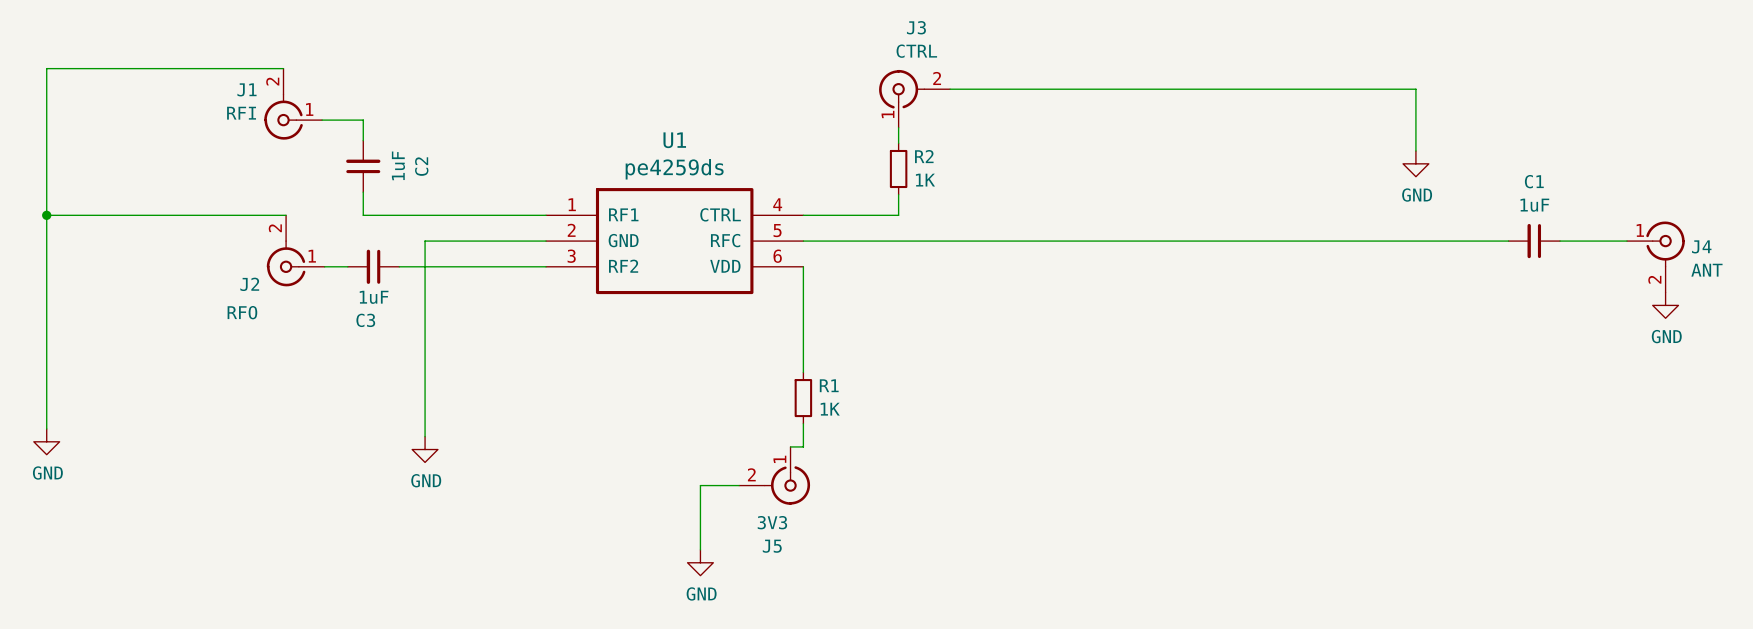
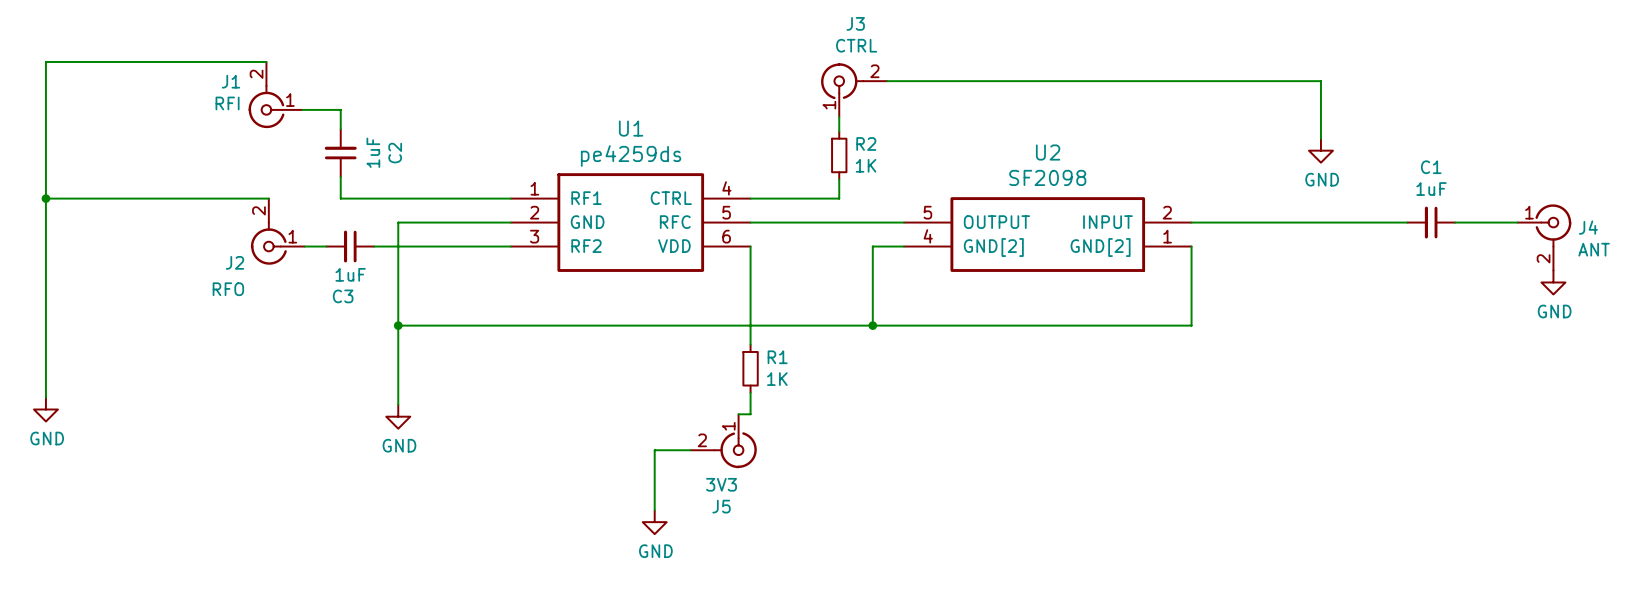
wire: (968, 241) (1276, 241) -> none
U2: none -> SF2098 (1047, 234)
wire: none -> (903, 246) (872, 246) (872, 325)
wire: none -> (1191, 246) (1191, 325) (398, 325)
junction: none -> (398, 325)
junction: none -> (872, 325)

